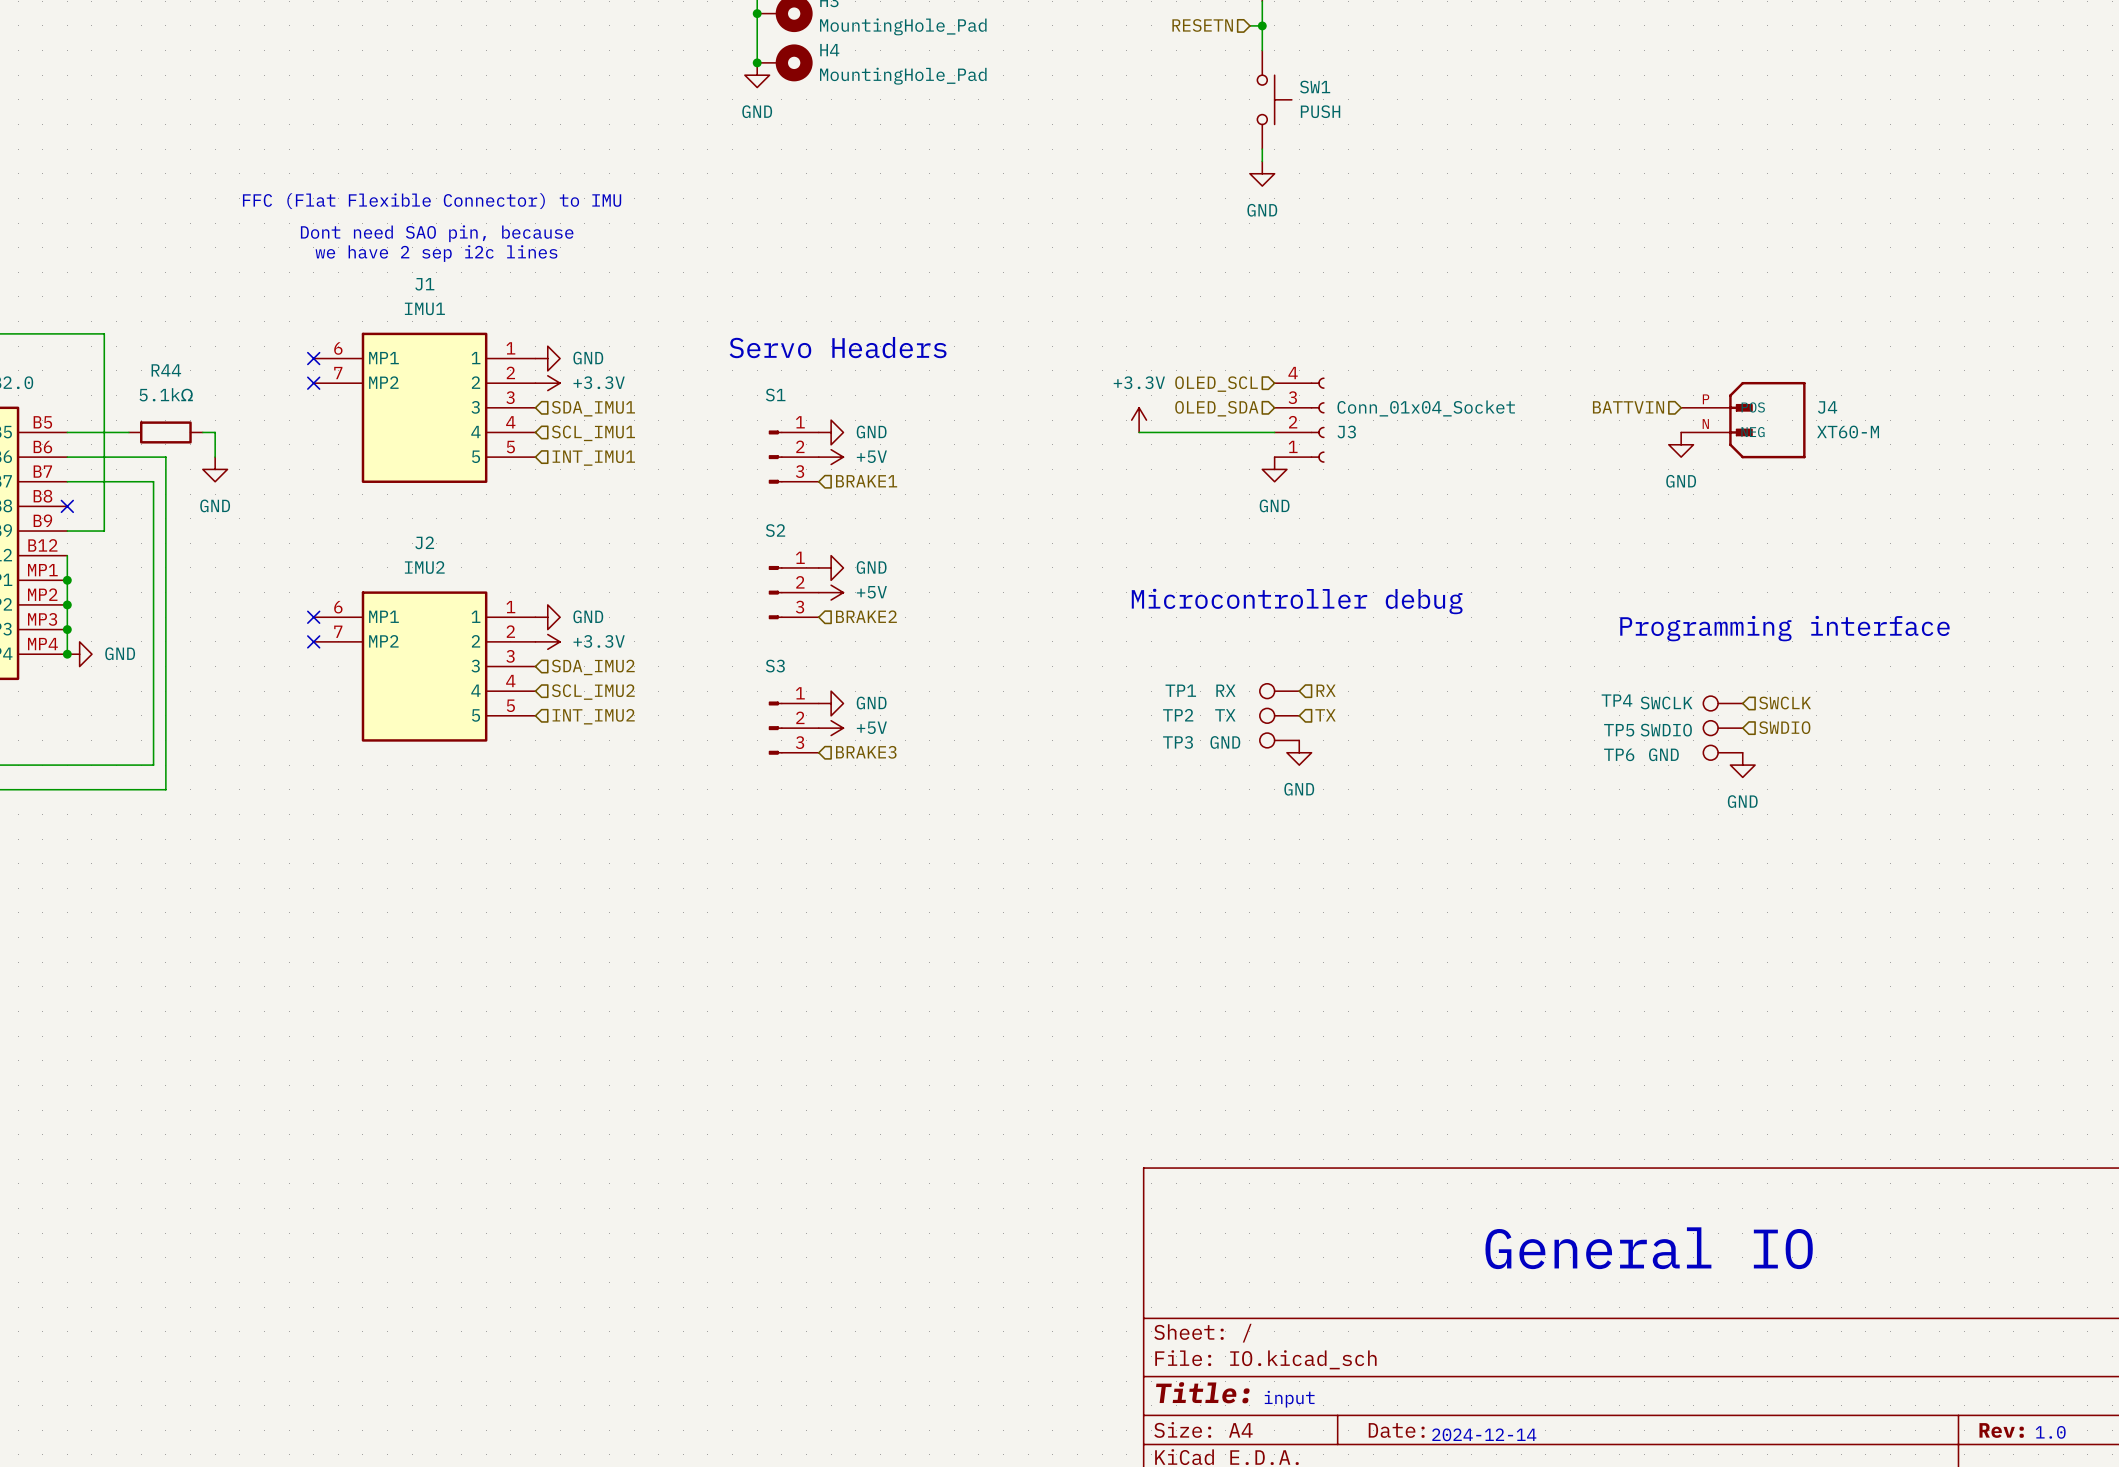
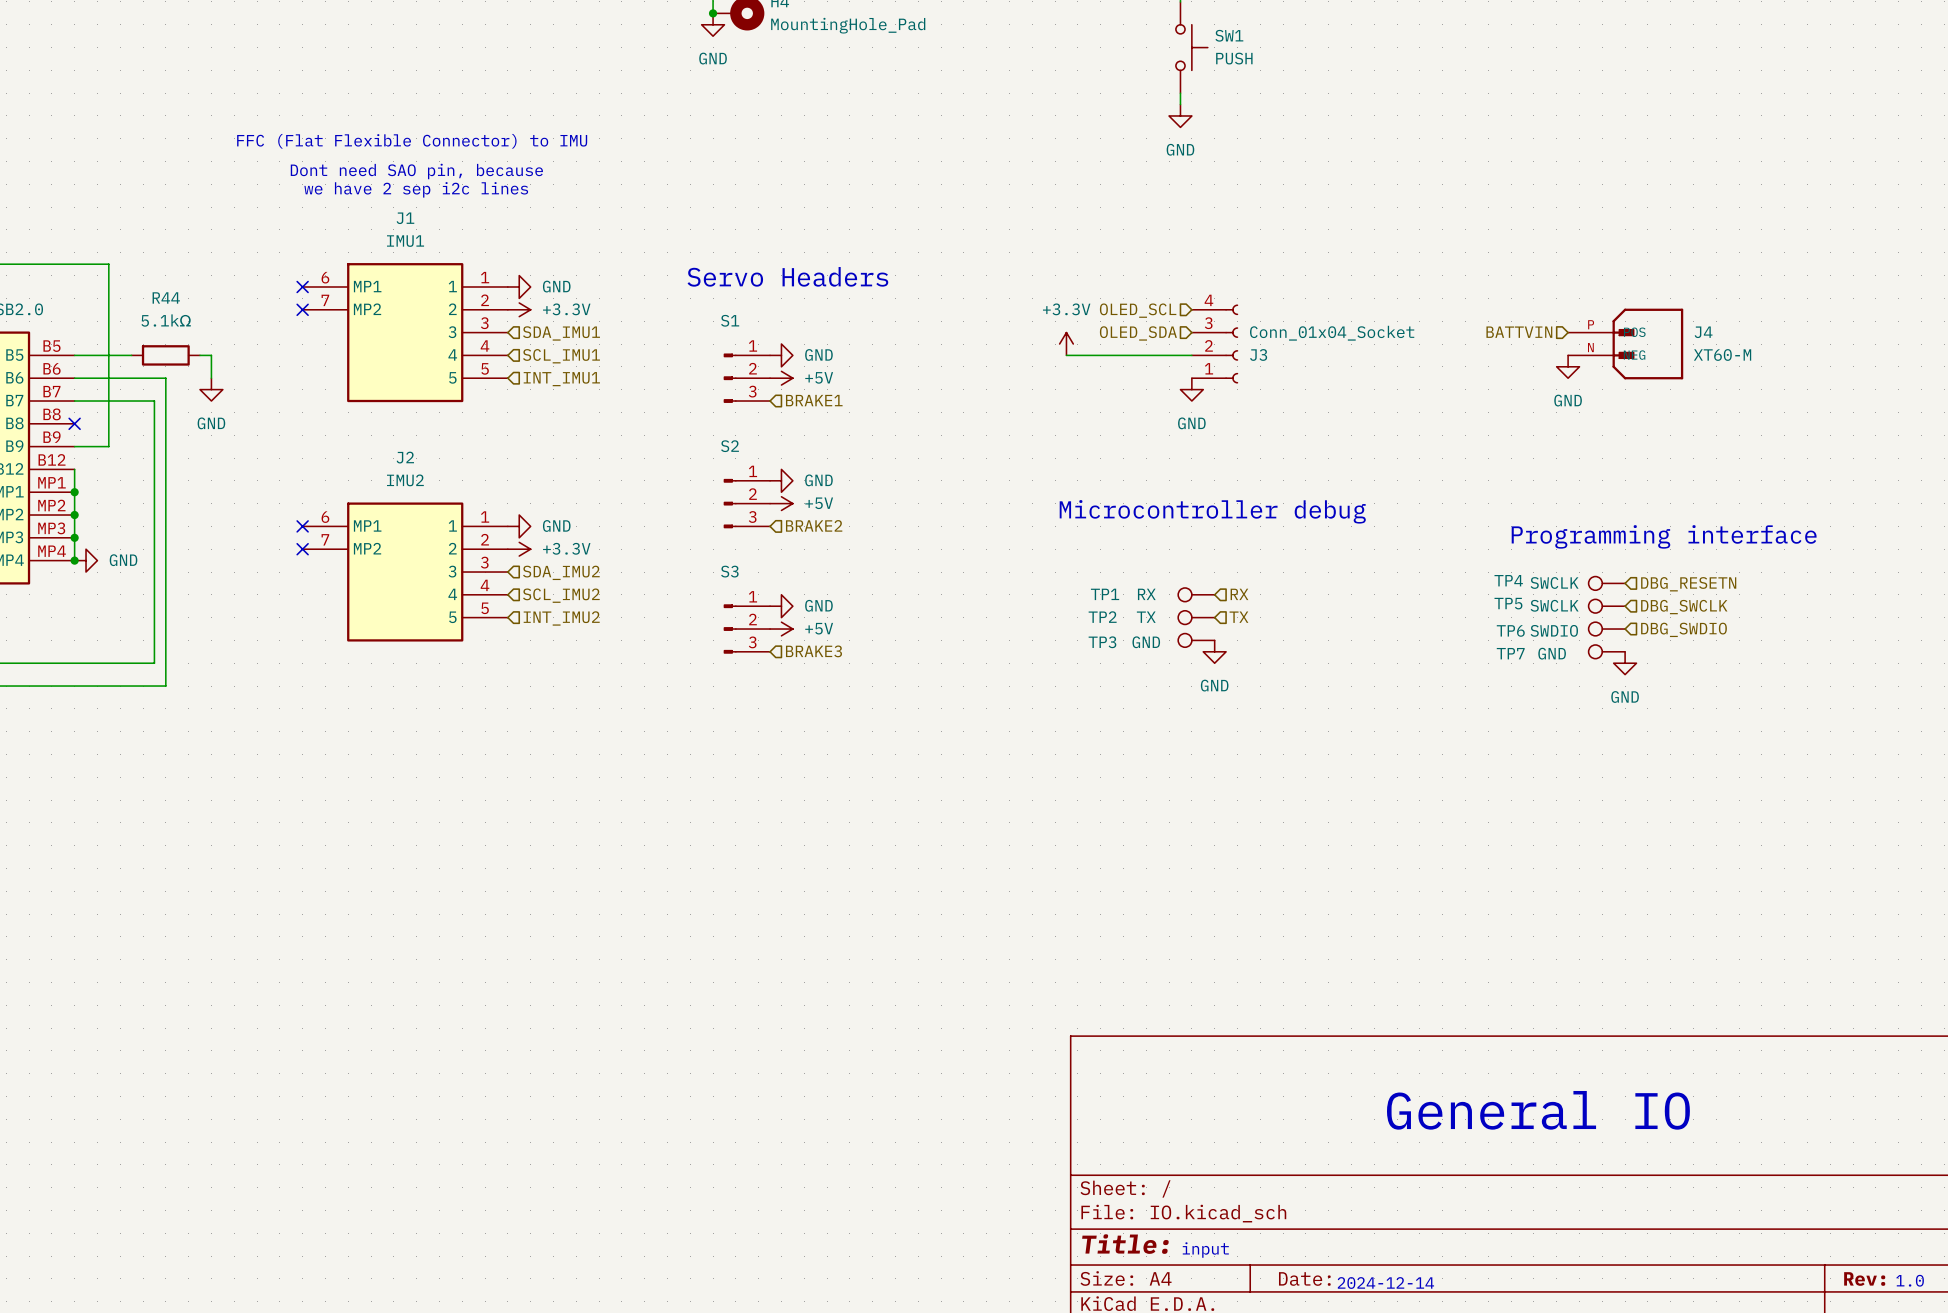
TP4: none -> SWCLK (1606, 583)
hierarchical label: none -> DBG_RESETN (1688, 584)
TP4 name: TP4 (1616, 700) -> TP5 (1508, 603)
hierarchical label: SWCLK (1785, 703) -> DBG_SWCLK (1684, 607)
hierarchical label: SWDIO (1784, 727) -> DBG_SWDIO (1683, 629)
TP5 name: TP5 (1619, 730) -> TP6 (1510, 630)
TP6 name: TP6 (1619, 754) -> TP7 (1510, 653)

